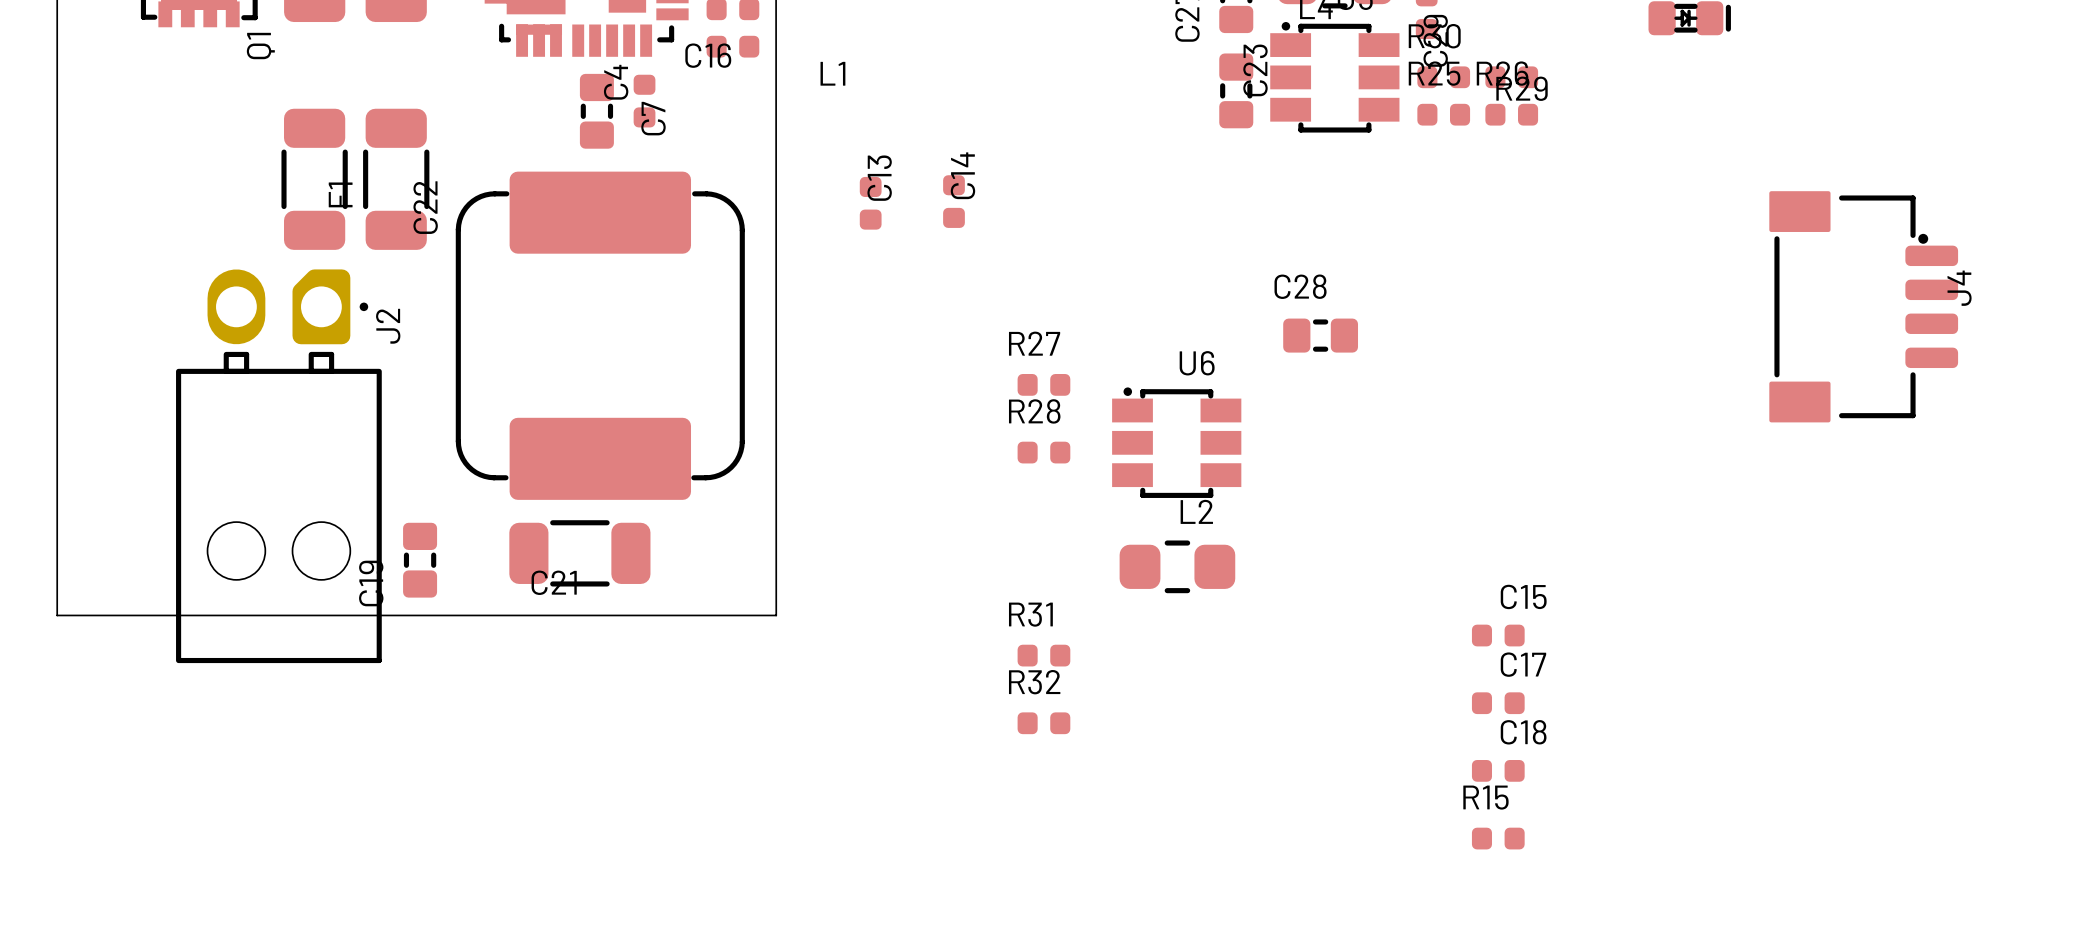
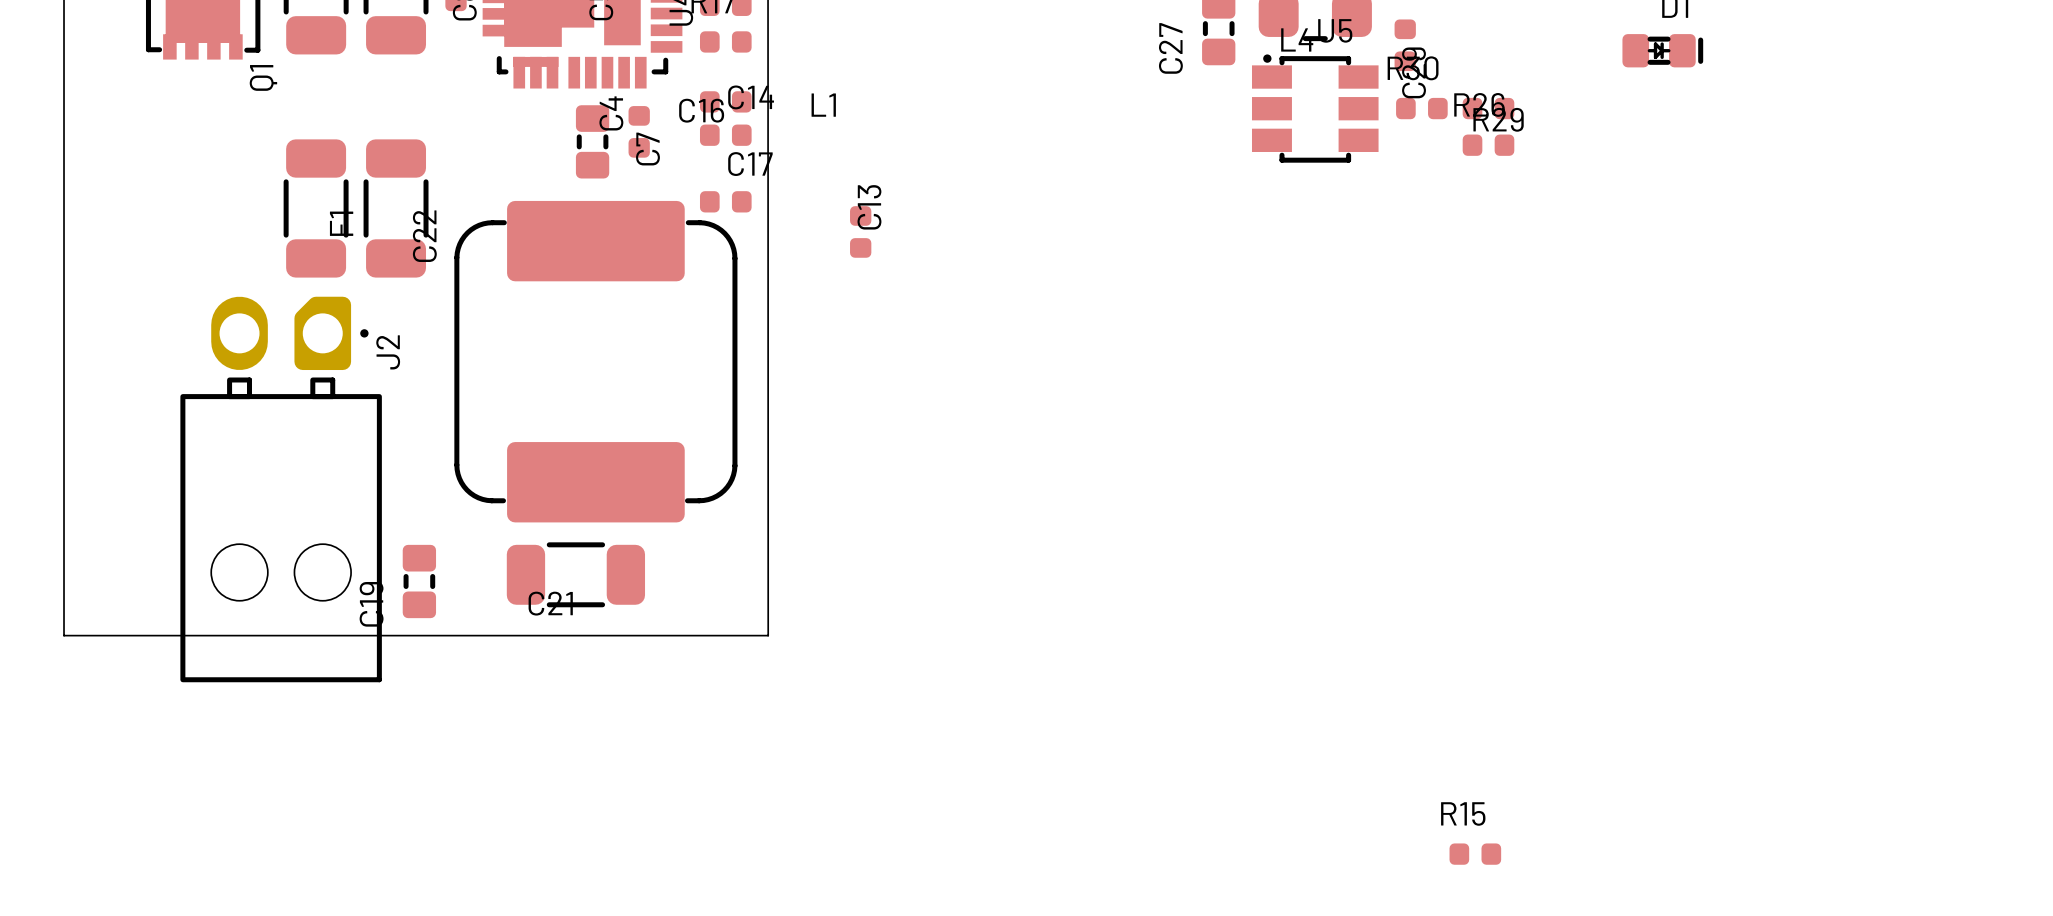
C16 position: (732, 46) -> (725, 101)
C23: (1236, 90) -> none
R25: (1443, 114) -> none
C14 rotation: 0° (954, 201) -> 90° clockwise (725, 135)
C14 position: (954, 201) -> (725, 135)
J4: (1863, 306) -> none
C28: (1320, 335) -> none
R27: (1043, 384) -> none
U6: (1176, 442) -> none
R28: (1043, 452) -> none
L2: (1177, 566) -> none
C15: (1498, 635) -> none
R31: (1043, 655) -> none
C17 position: (1498, 703) -> (725, 201)
R32: (1043, 723) -> none
C18: (1498, 770) -> none

